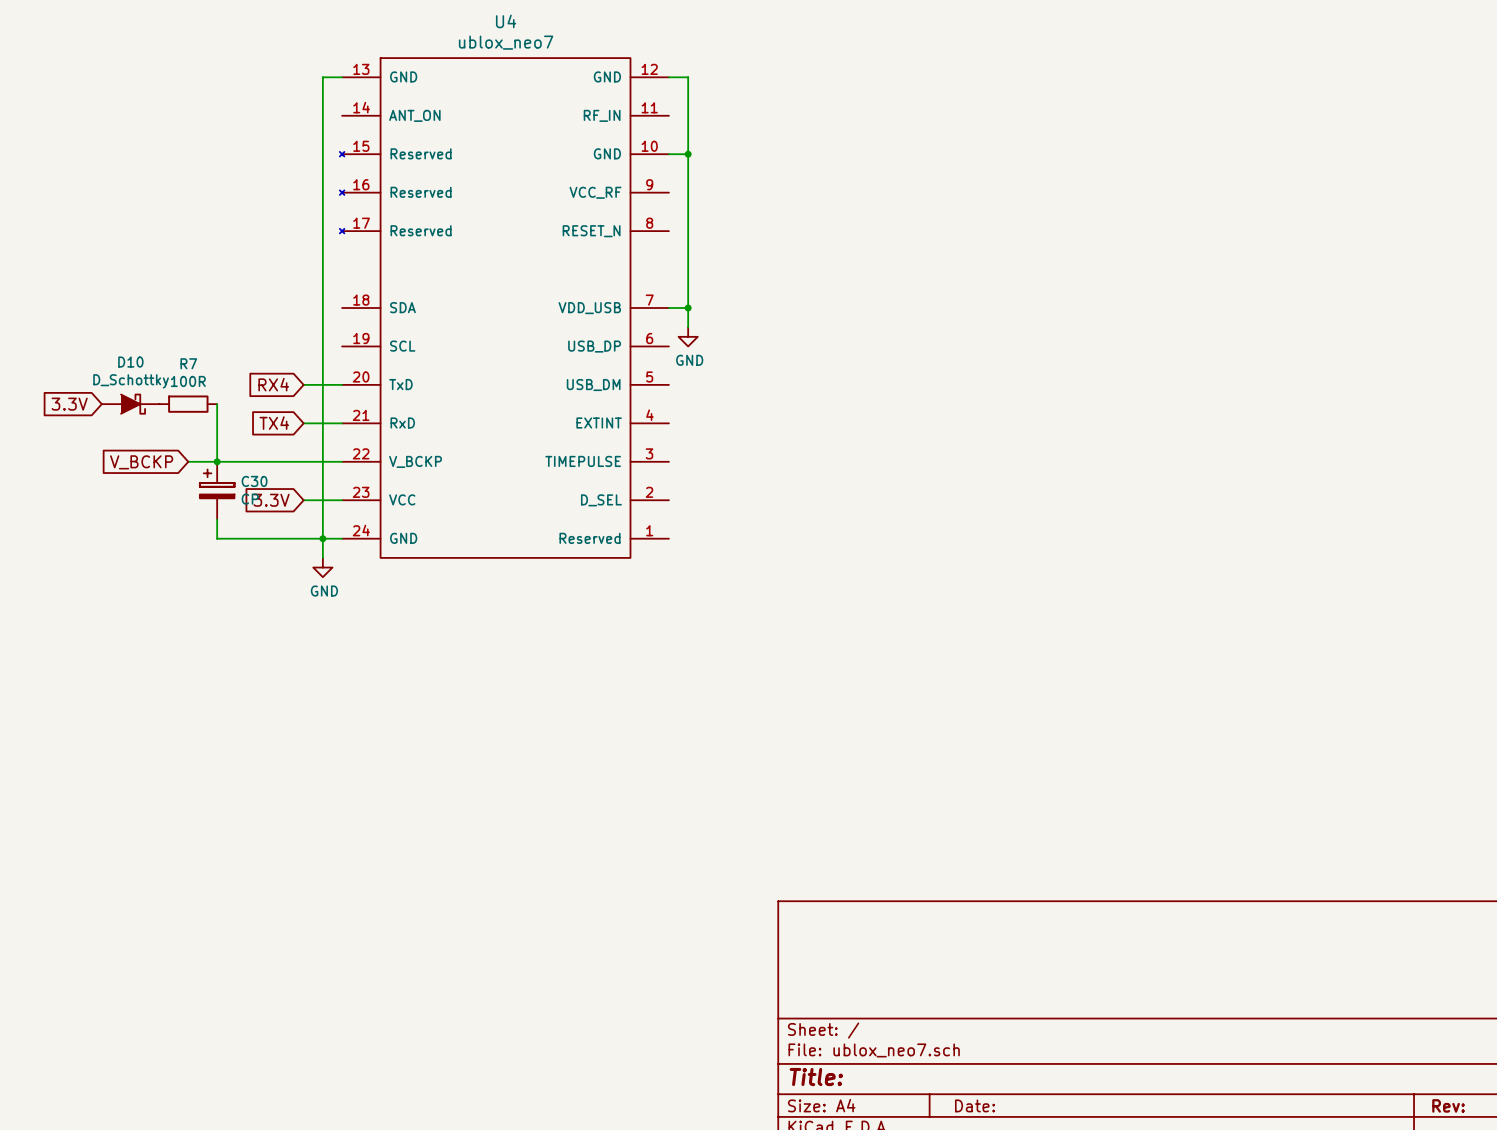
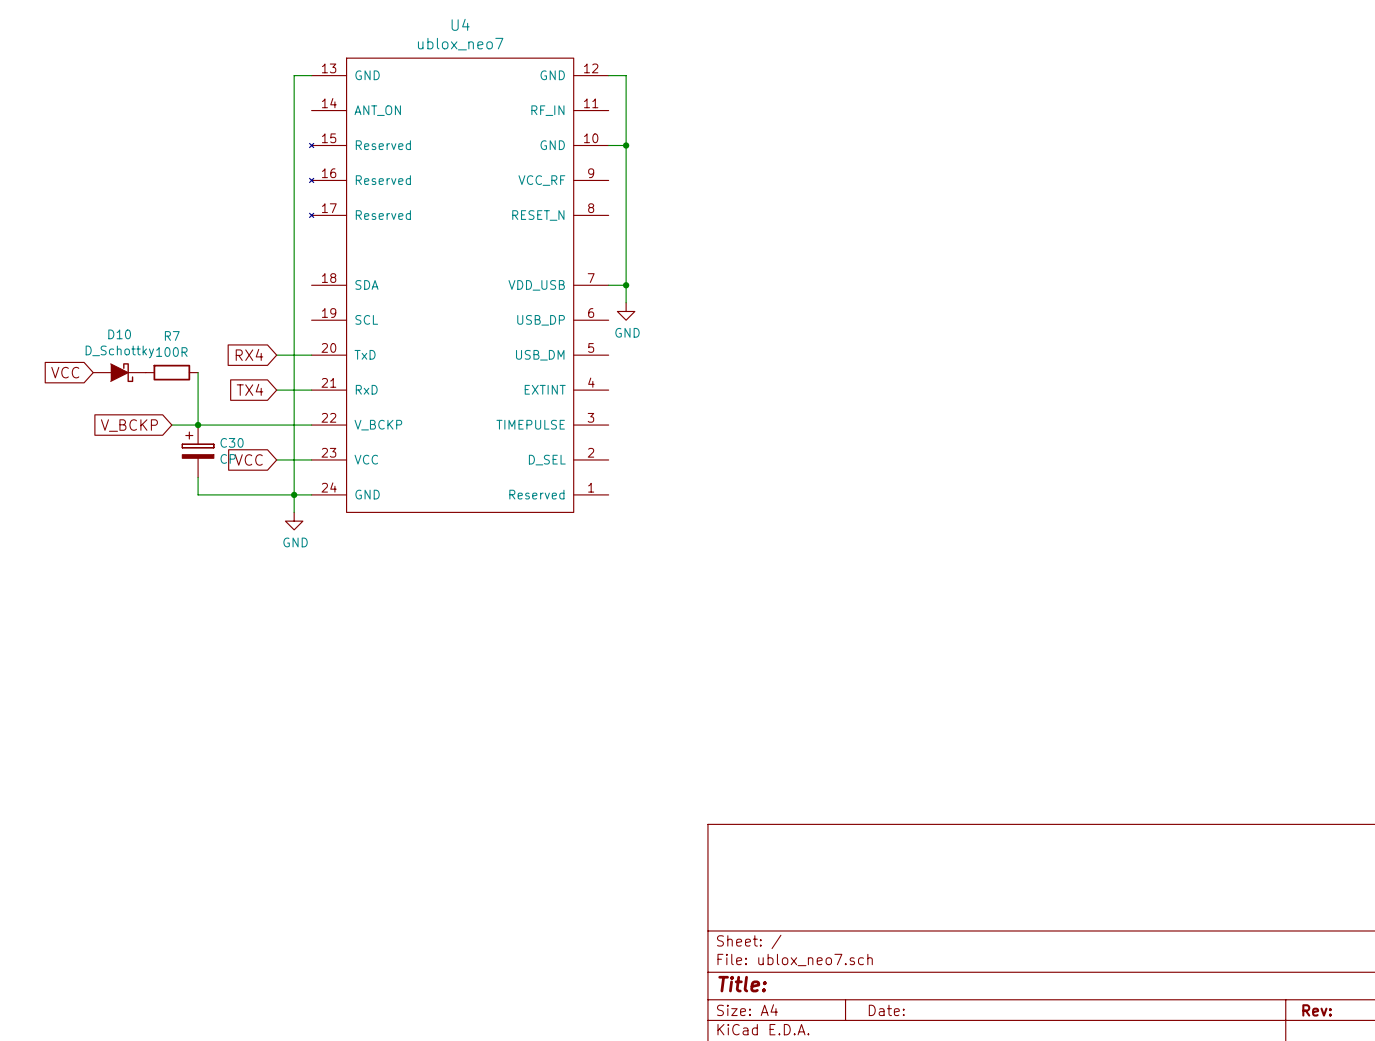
global label: 3.3V (69, 404) -> VCC (65, 372)
global label: 3.3V (271, 500) -> VCC (248, 459)

